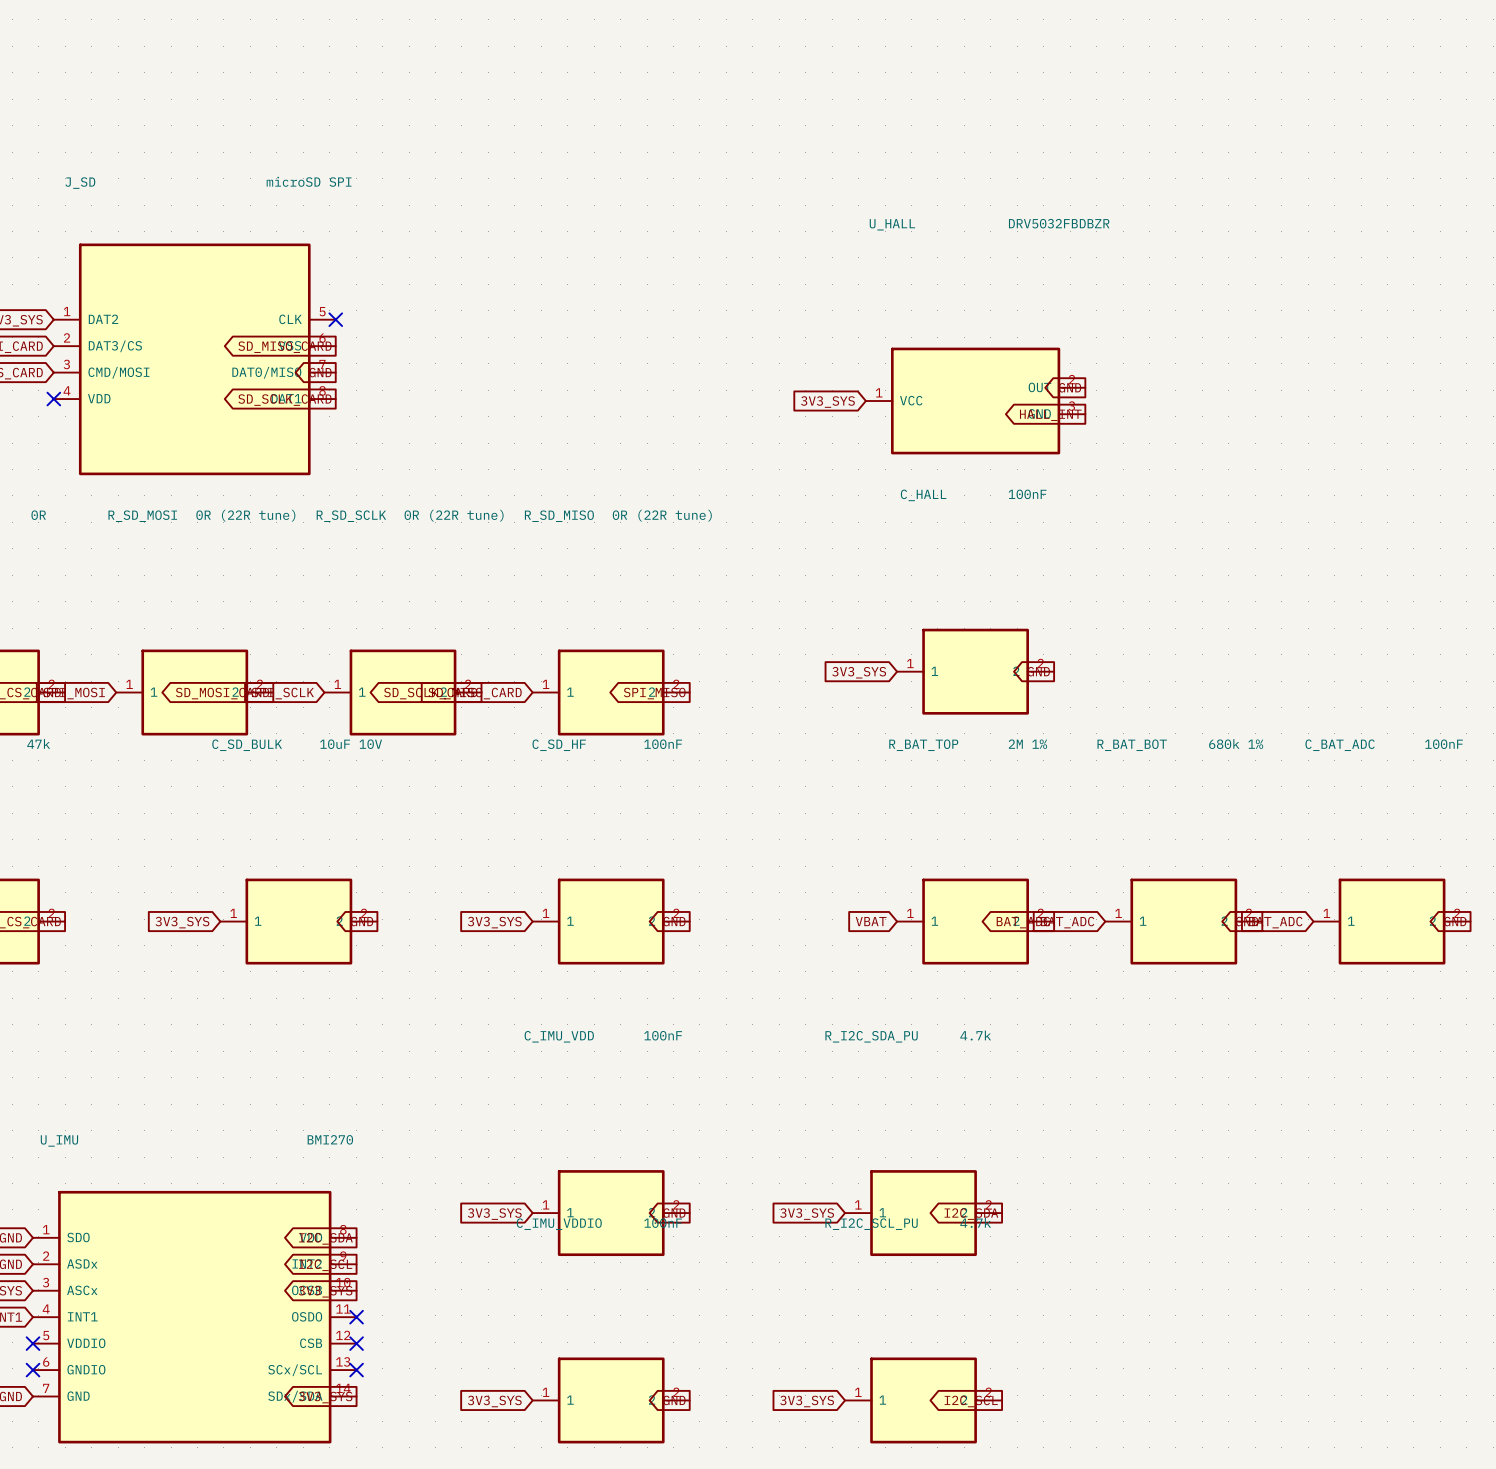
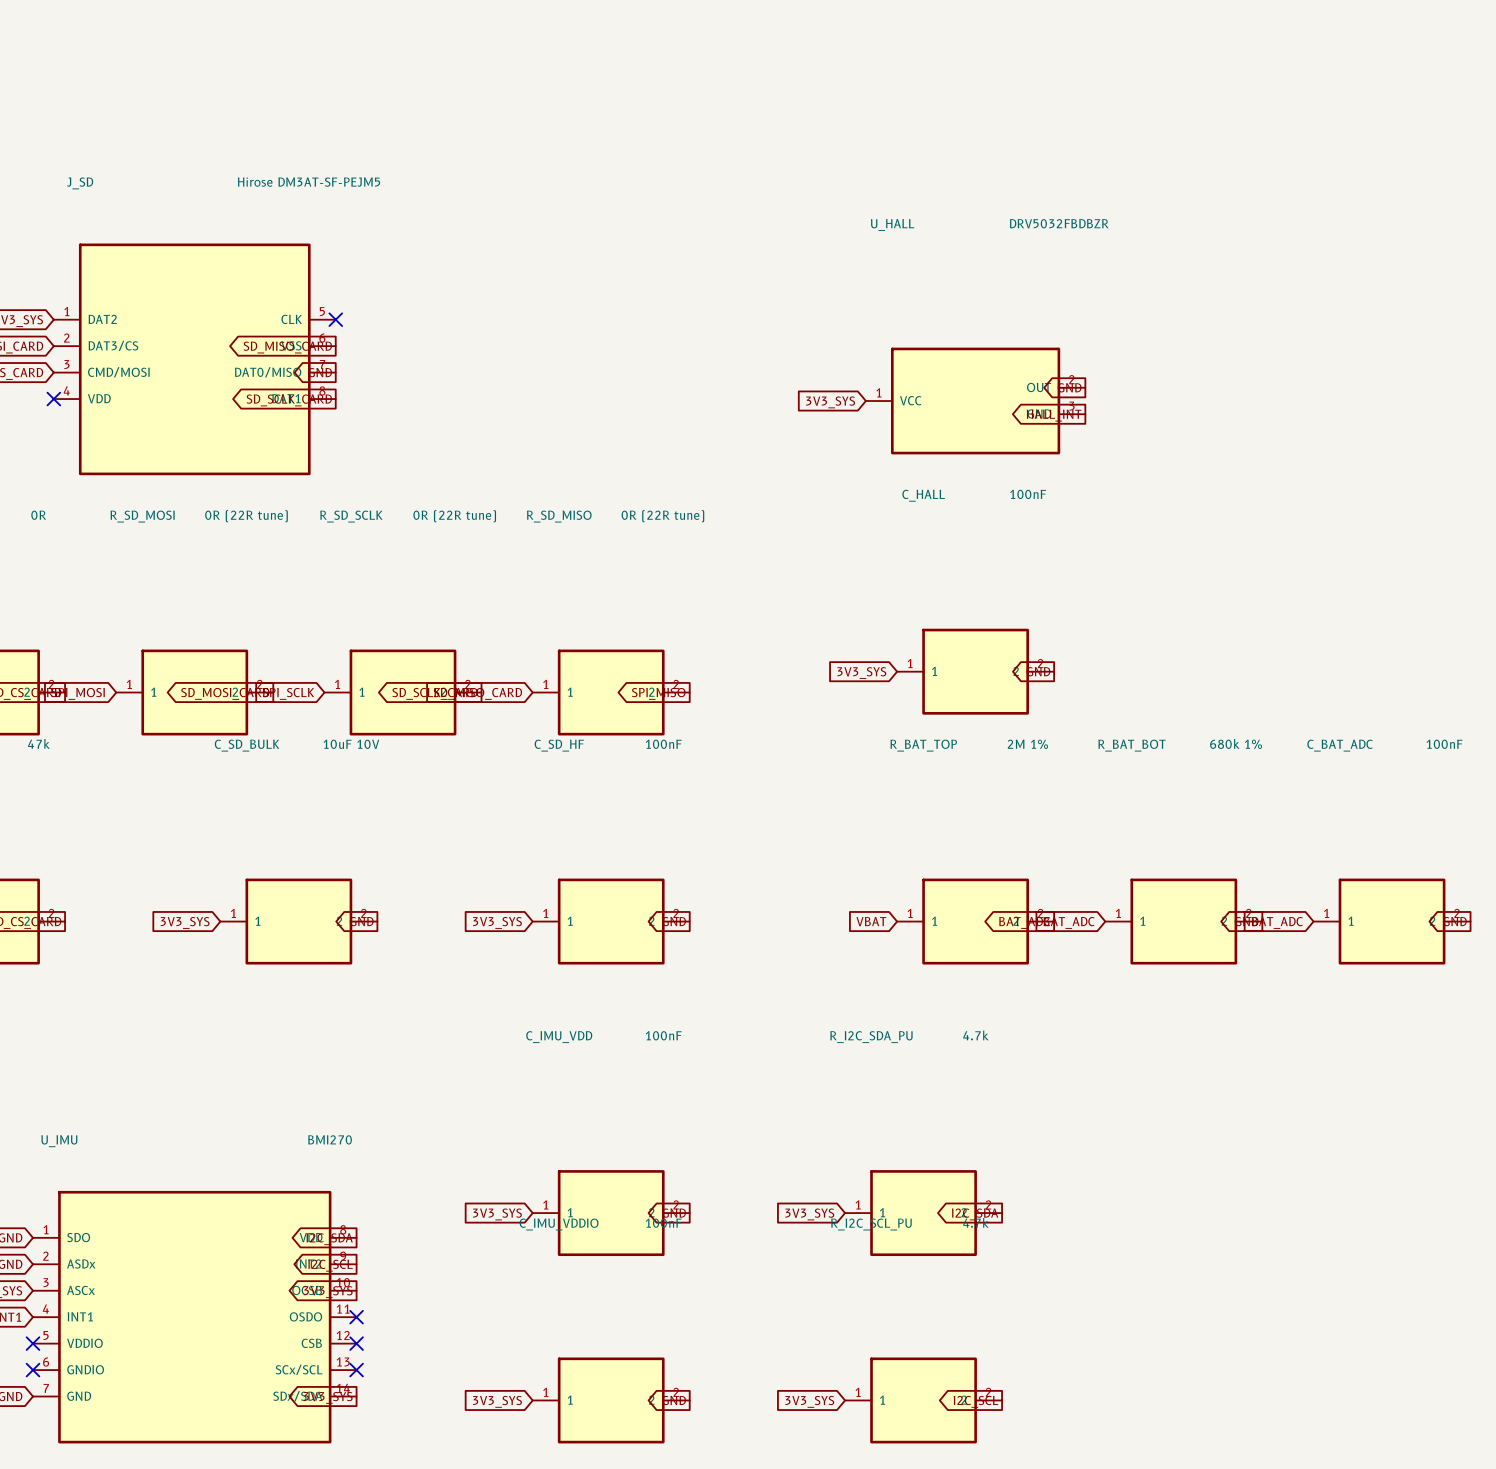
J_SD value: microSD SPI (309, 181) -> Hirose DM3AT-SF-PEJM5 (309, 182)

